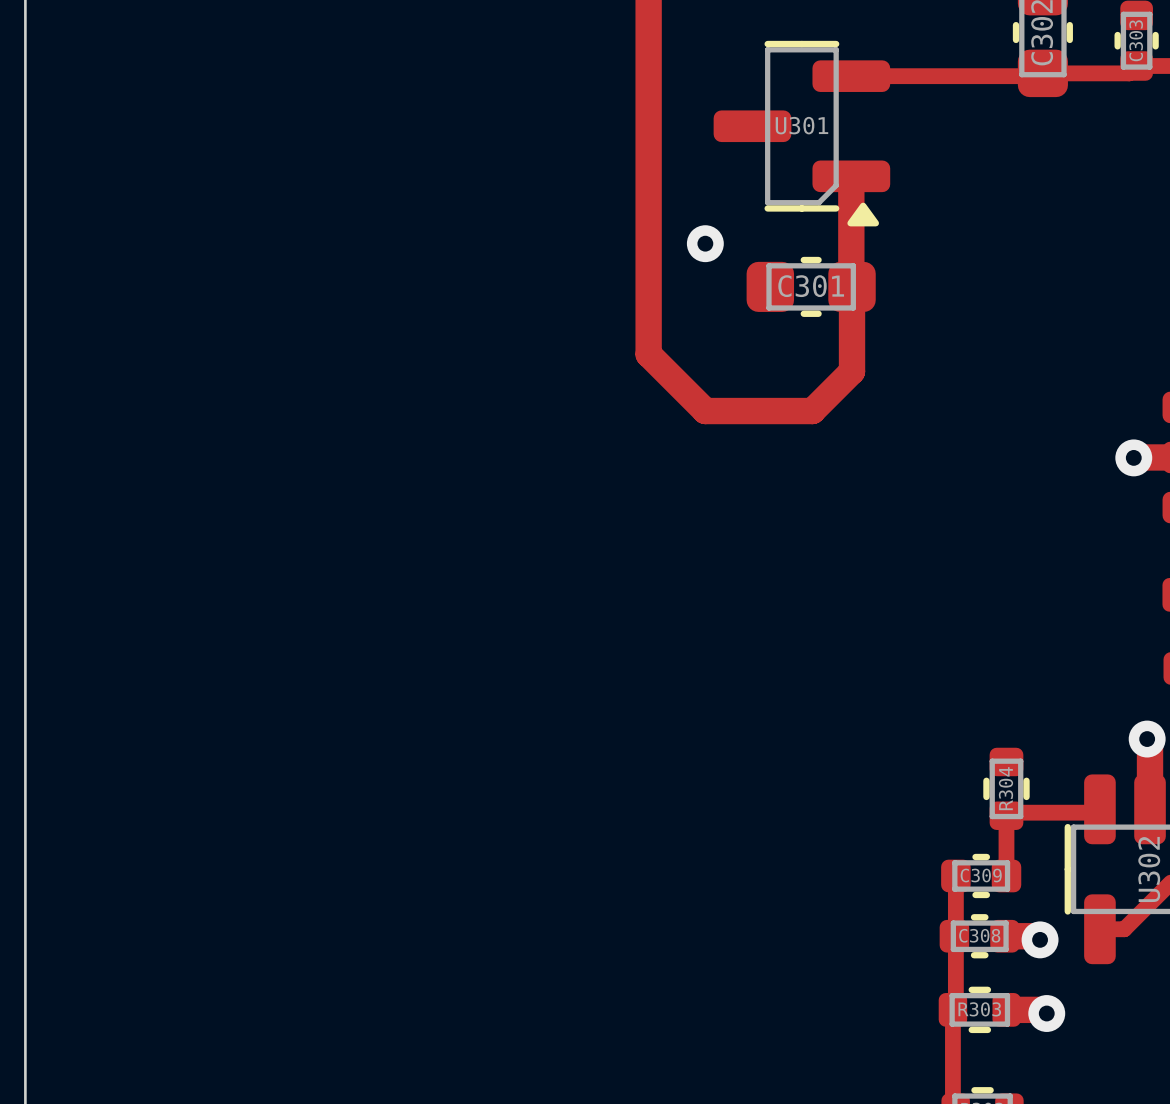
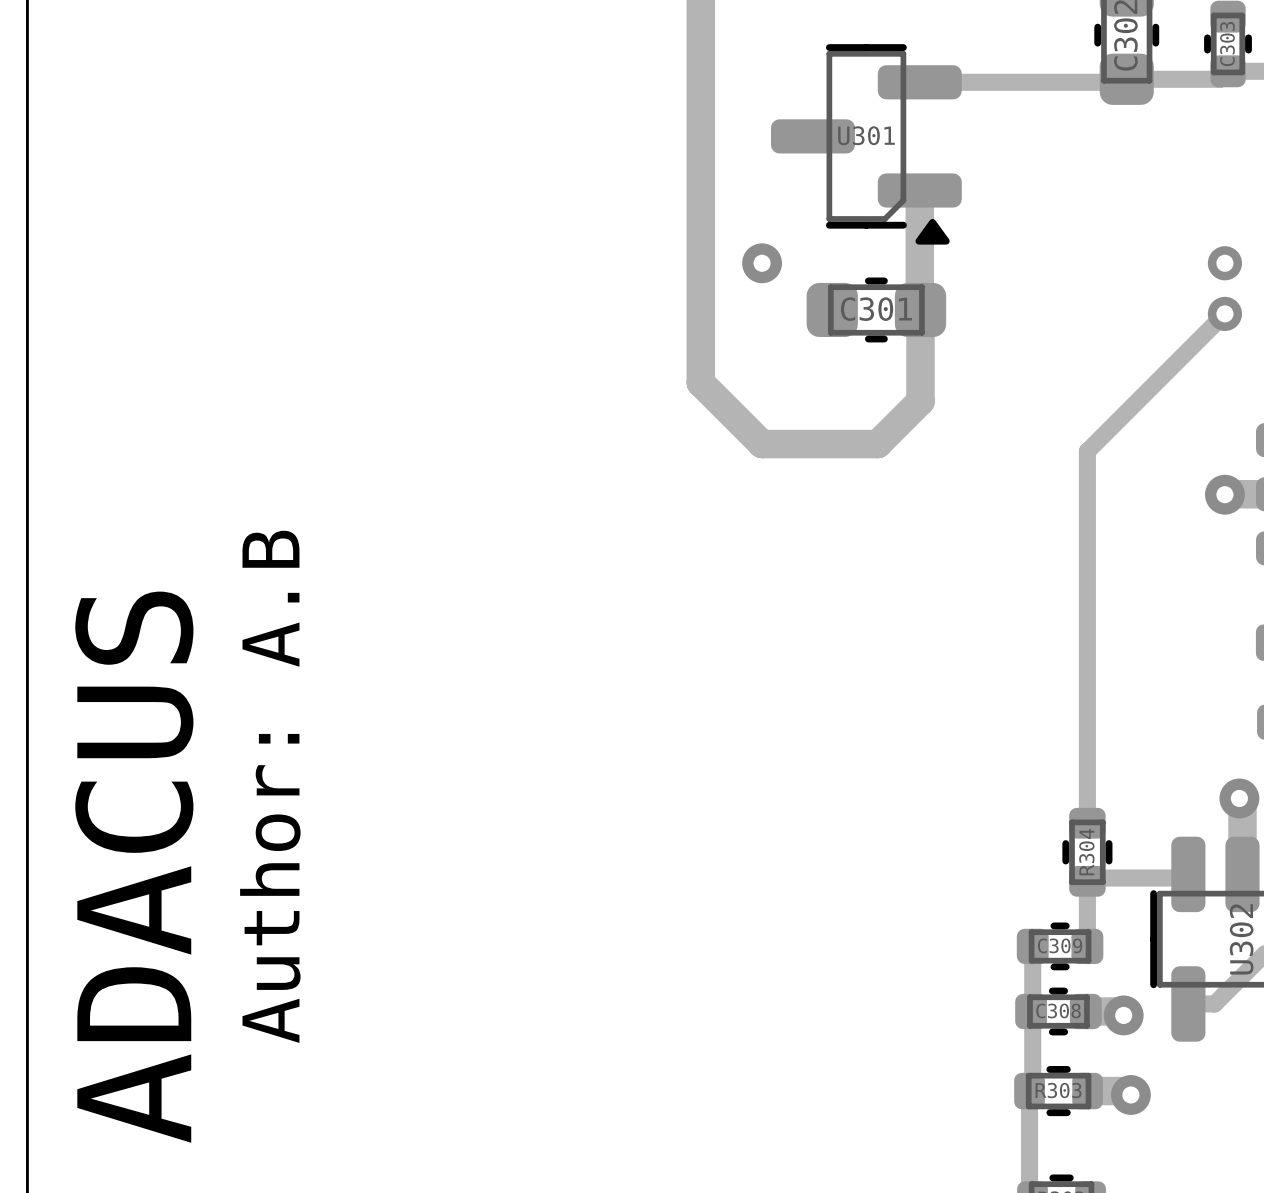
via: none -> (1224, 263)
track: none -> (1224, 313) (1087, 451) (1087, 823)
via: none -> (1224, 313)
text: none -> Author: A.B (270, 786)
text: none -> ADACUS (134, 867)

